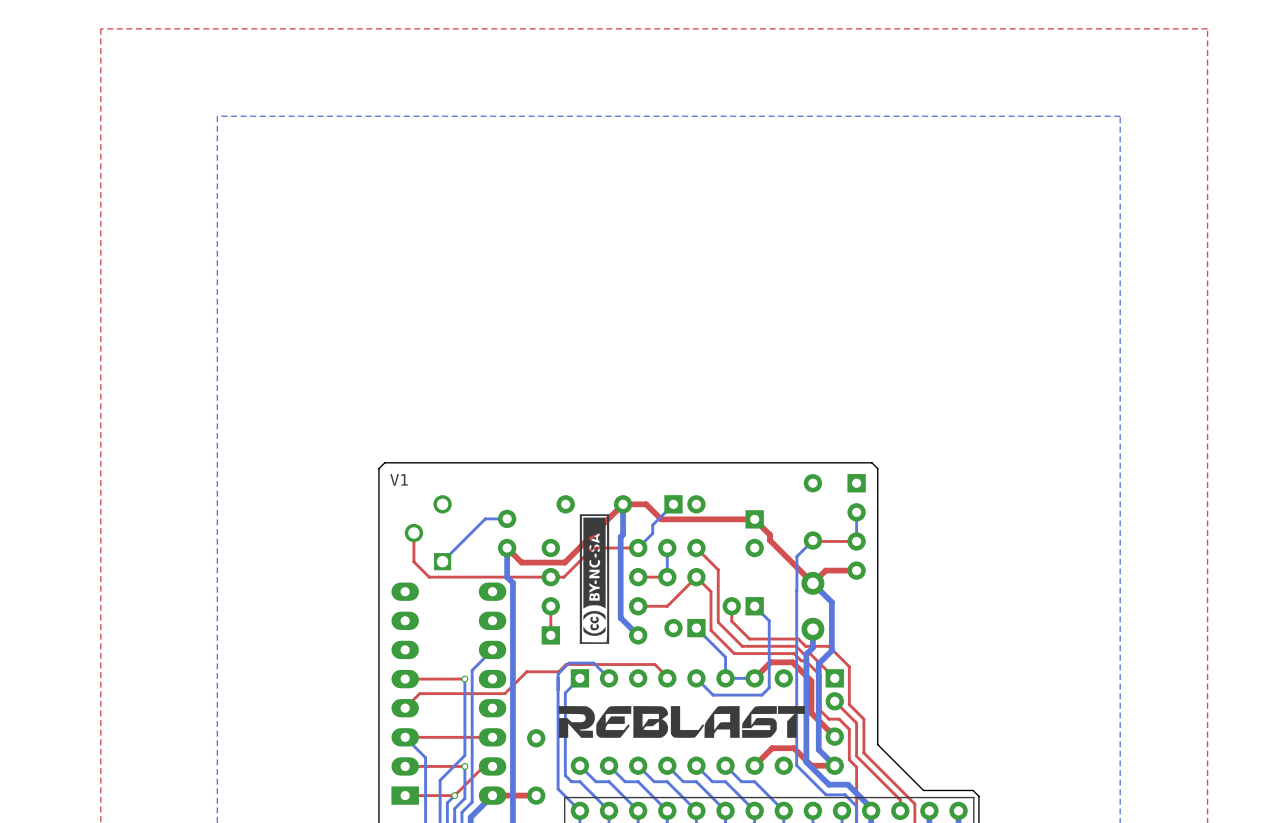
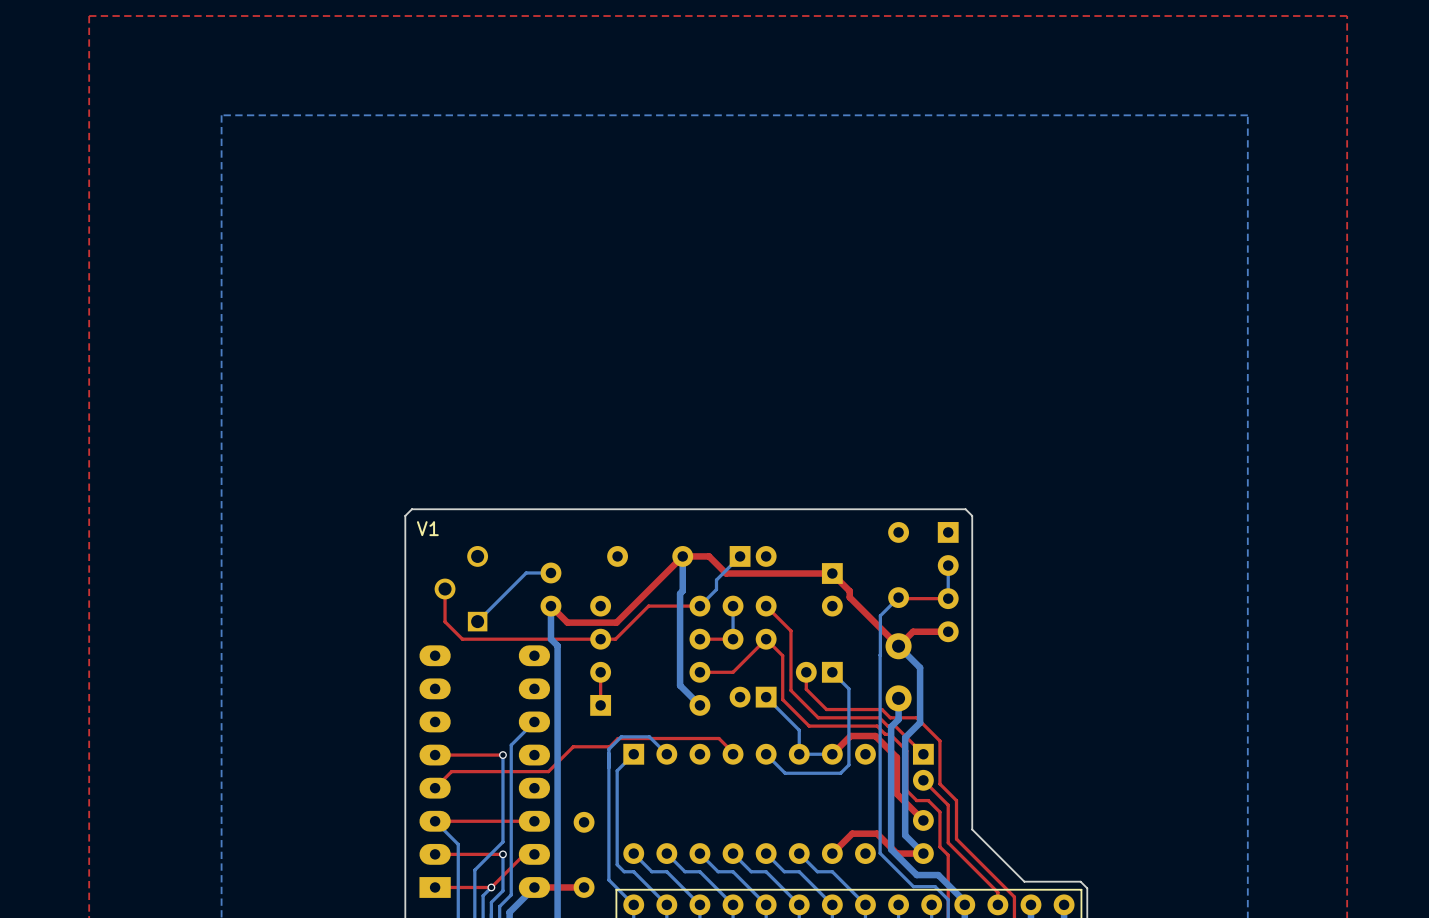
drawing: [579, 514, 610, 644] -> none
drawing: [558, 706, 806, 738] -> none

